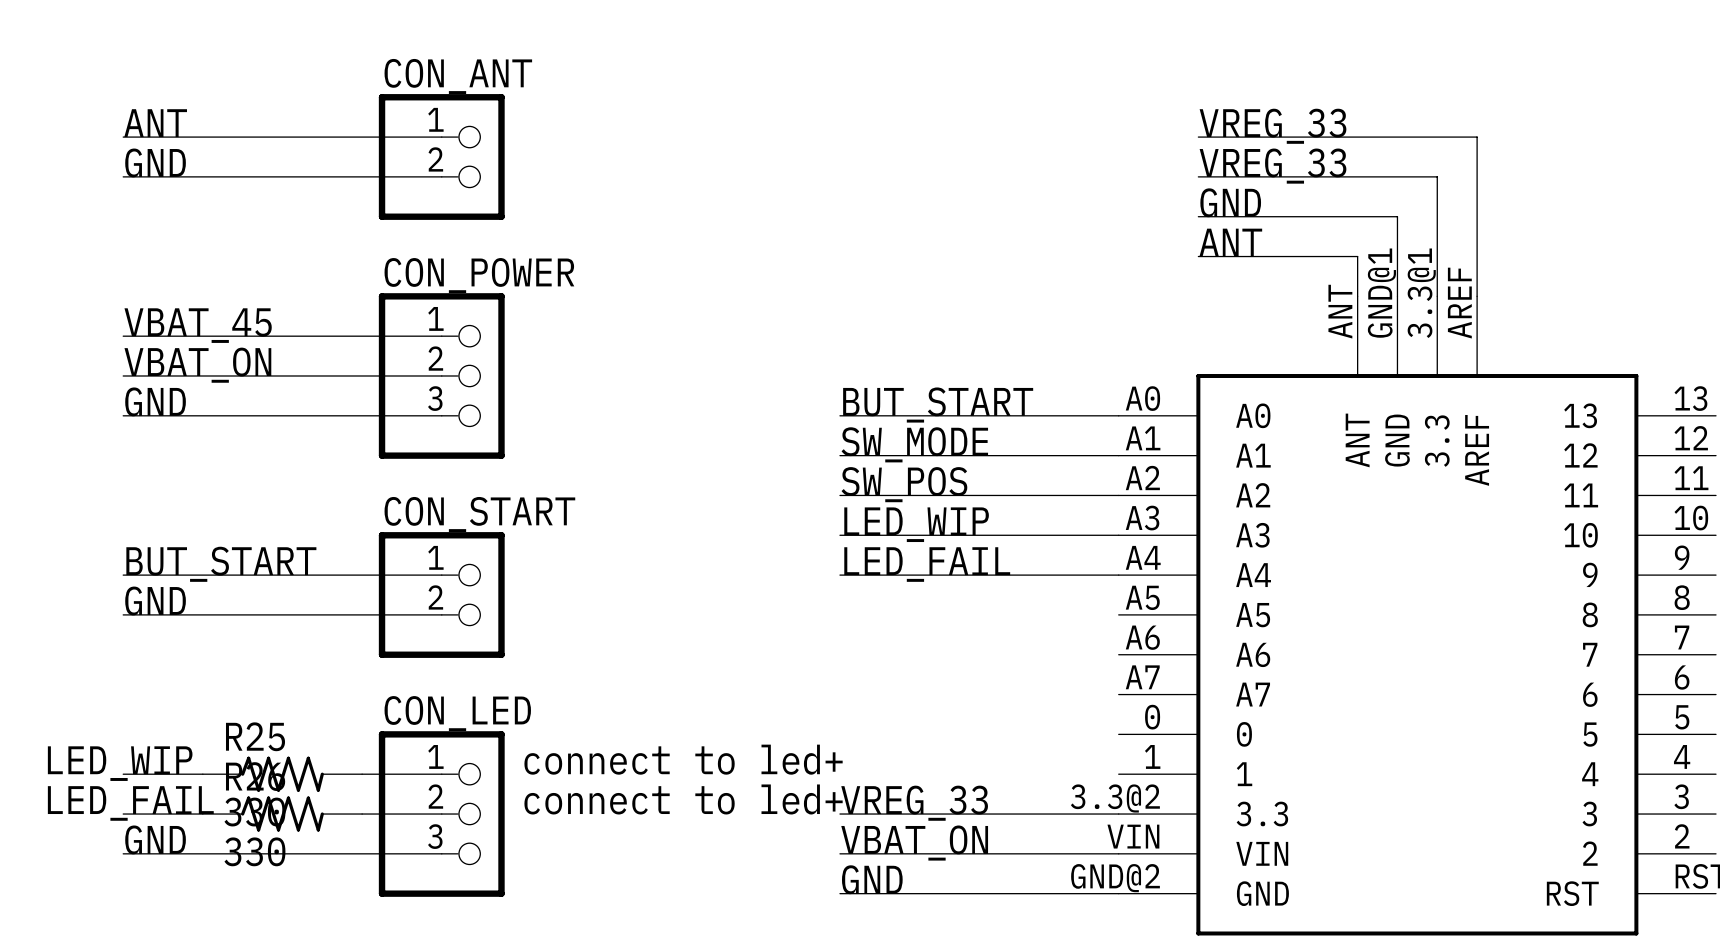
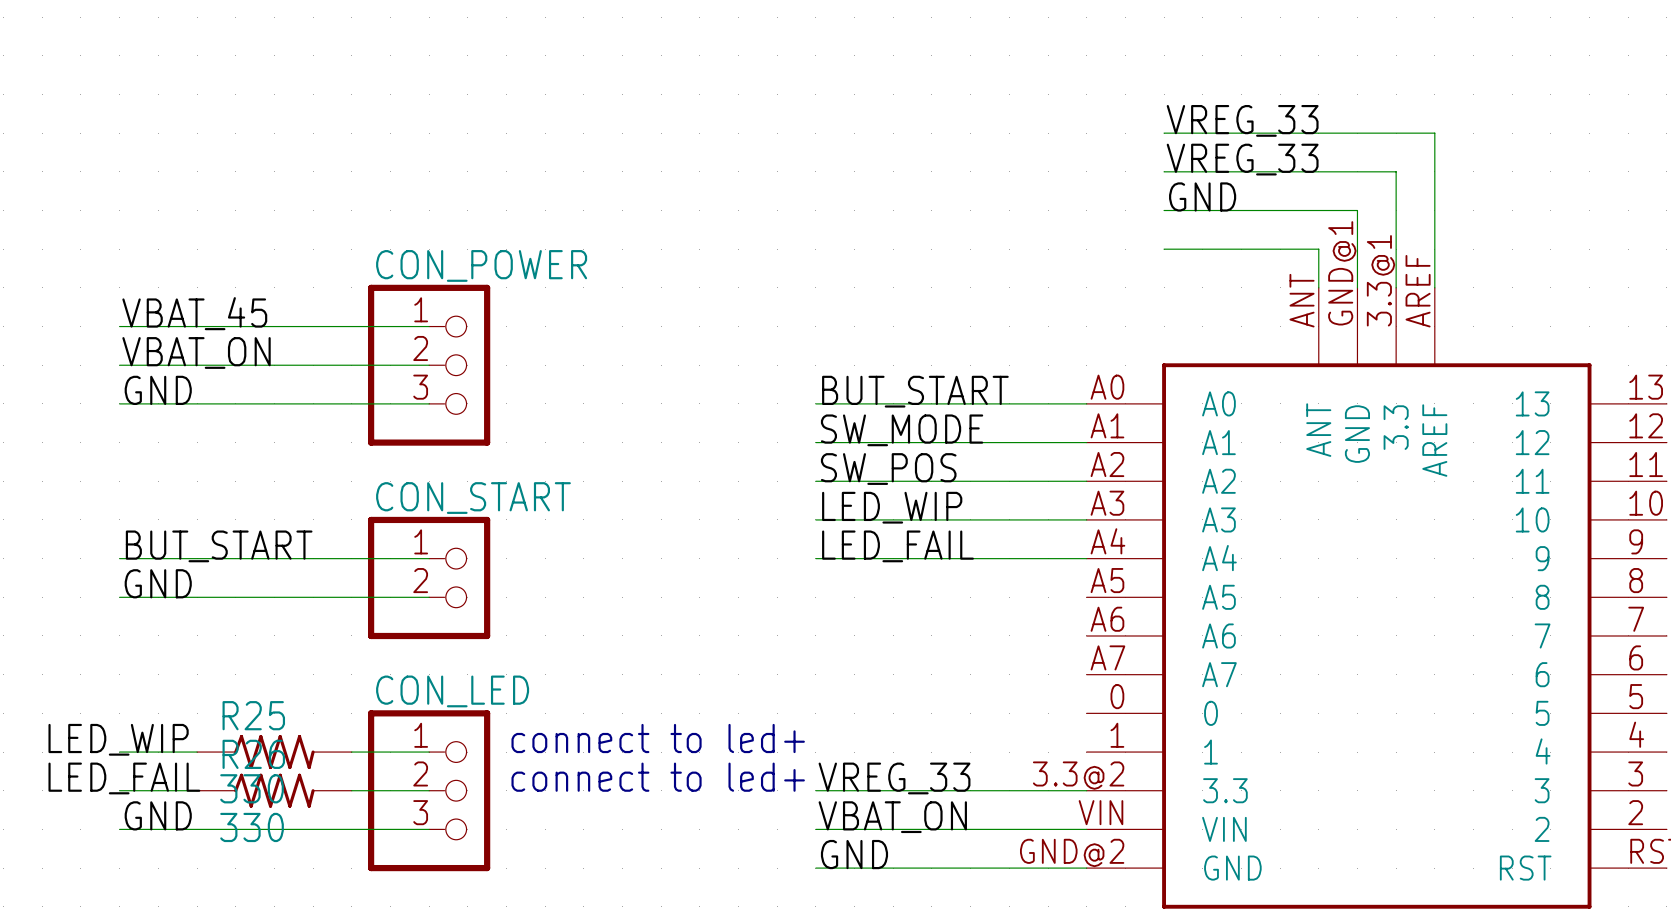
label: ANT (155, 123) -> none
wire: (123, 137) (441, 137) -> none
CON_ANT: (441, 156) -> none
label: GND (155, 162) -> none
wire: (123, 176) (441, 176) -> none
label: ANT (1230, 242) -> none

